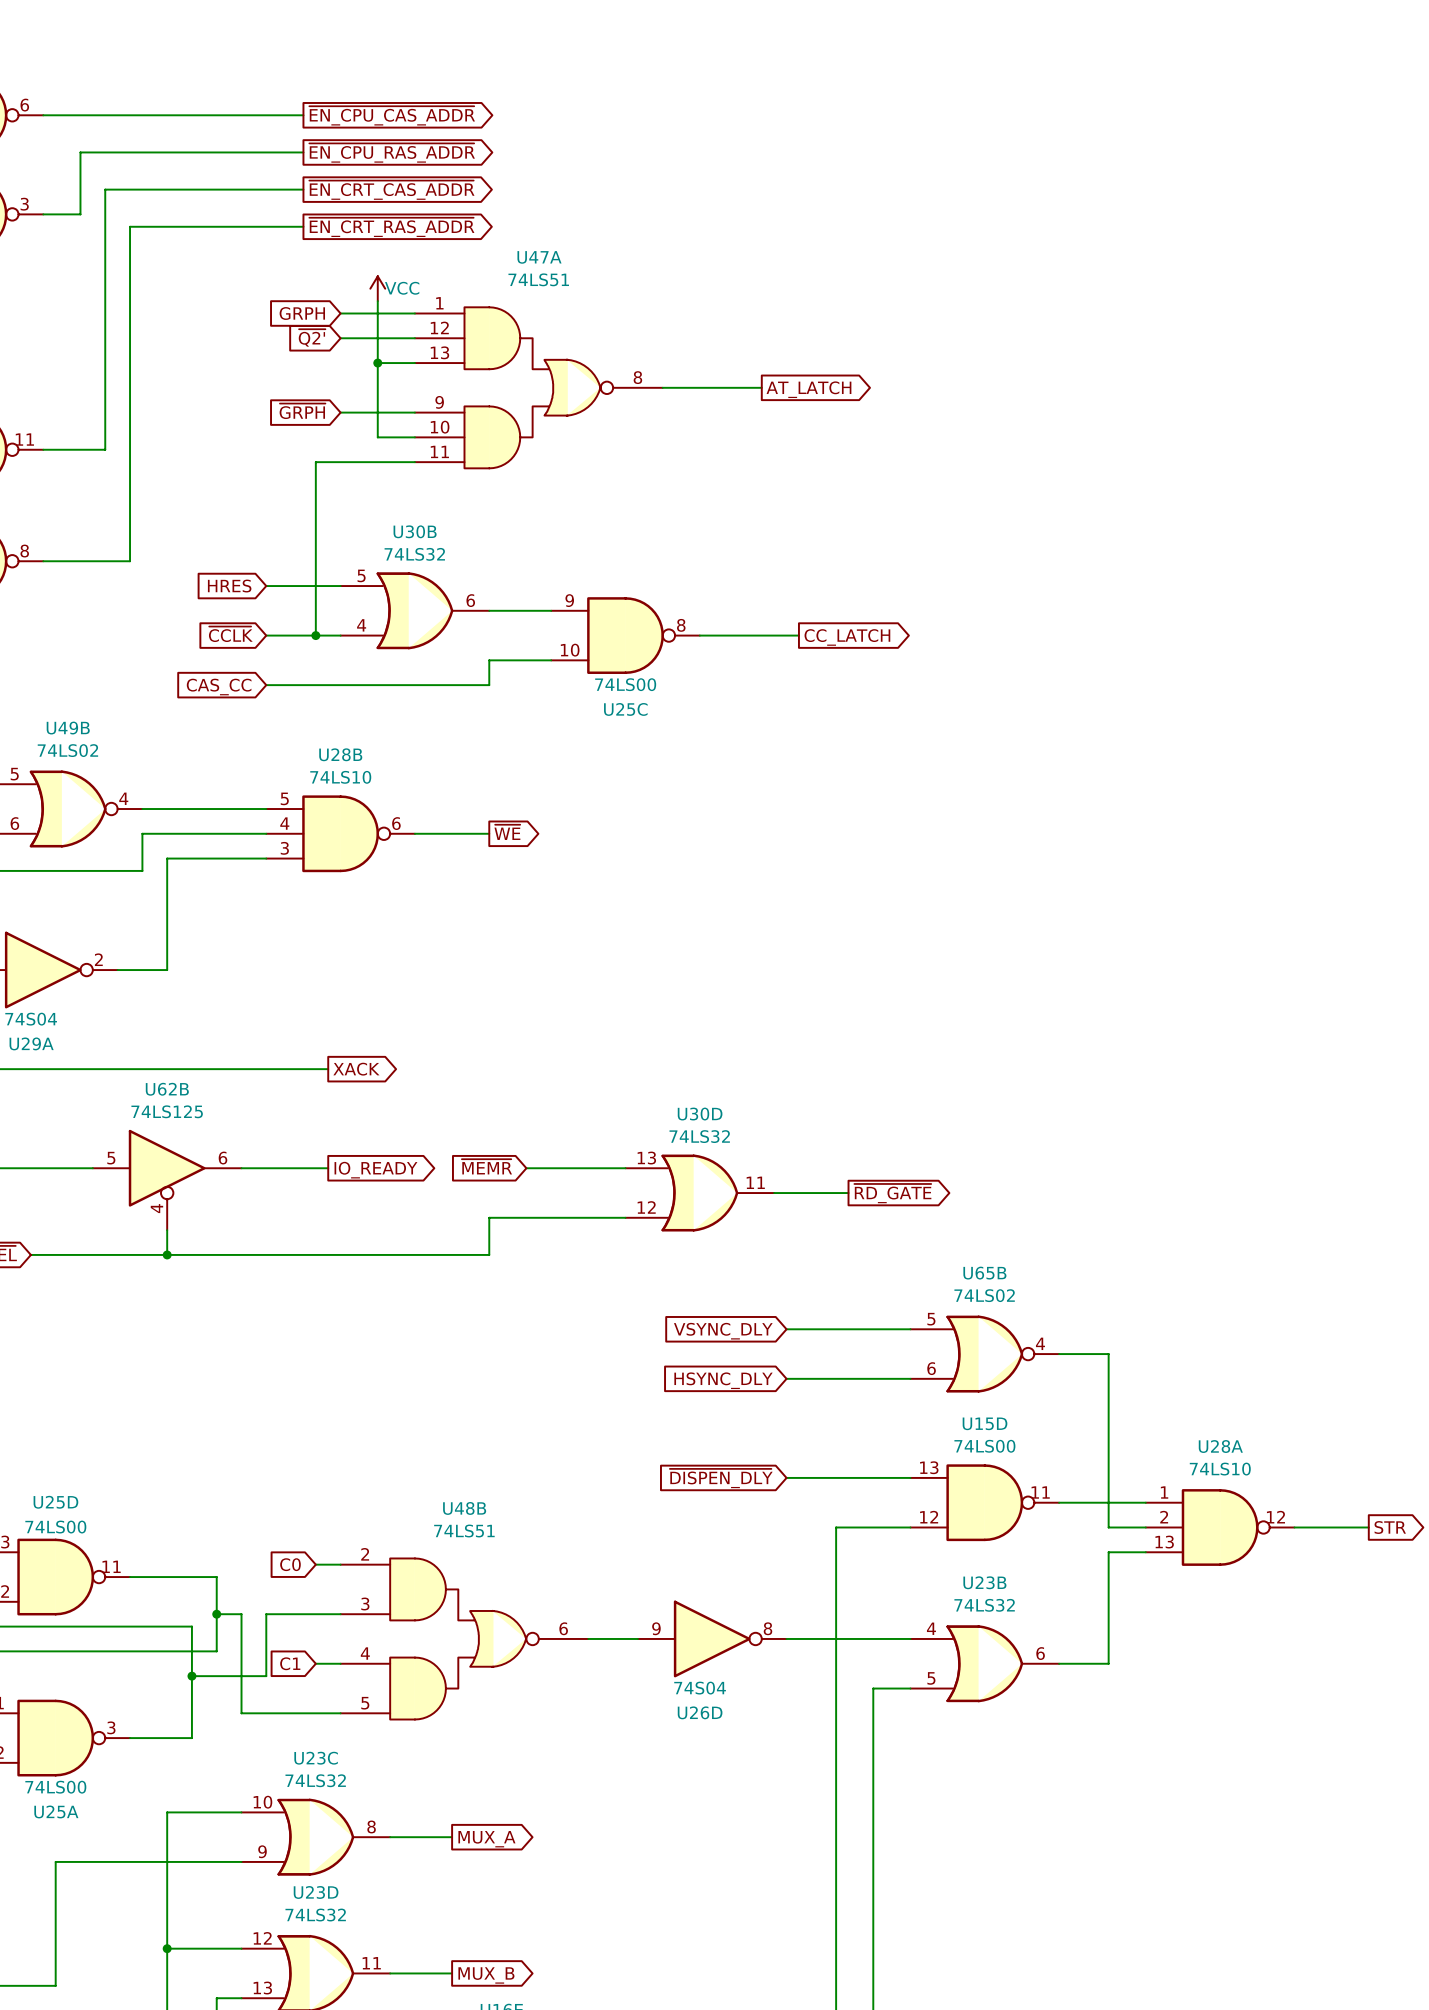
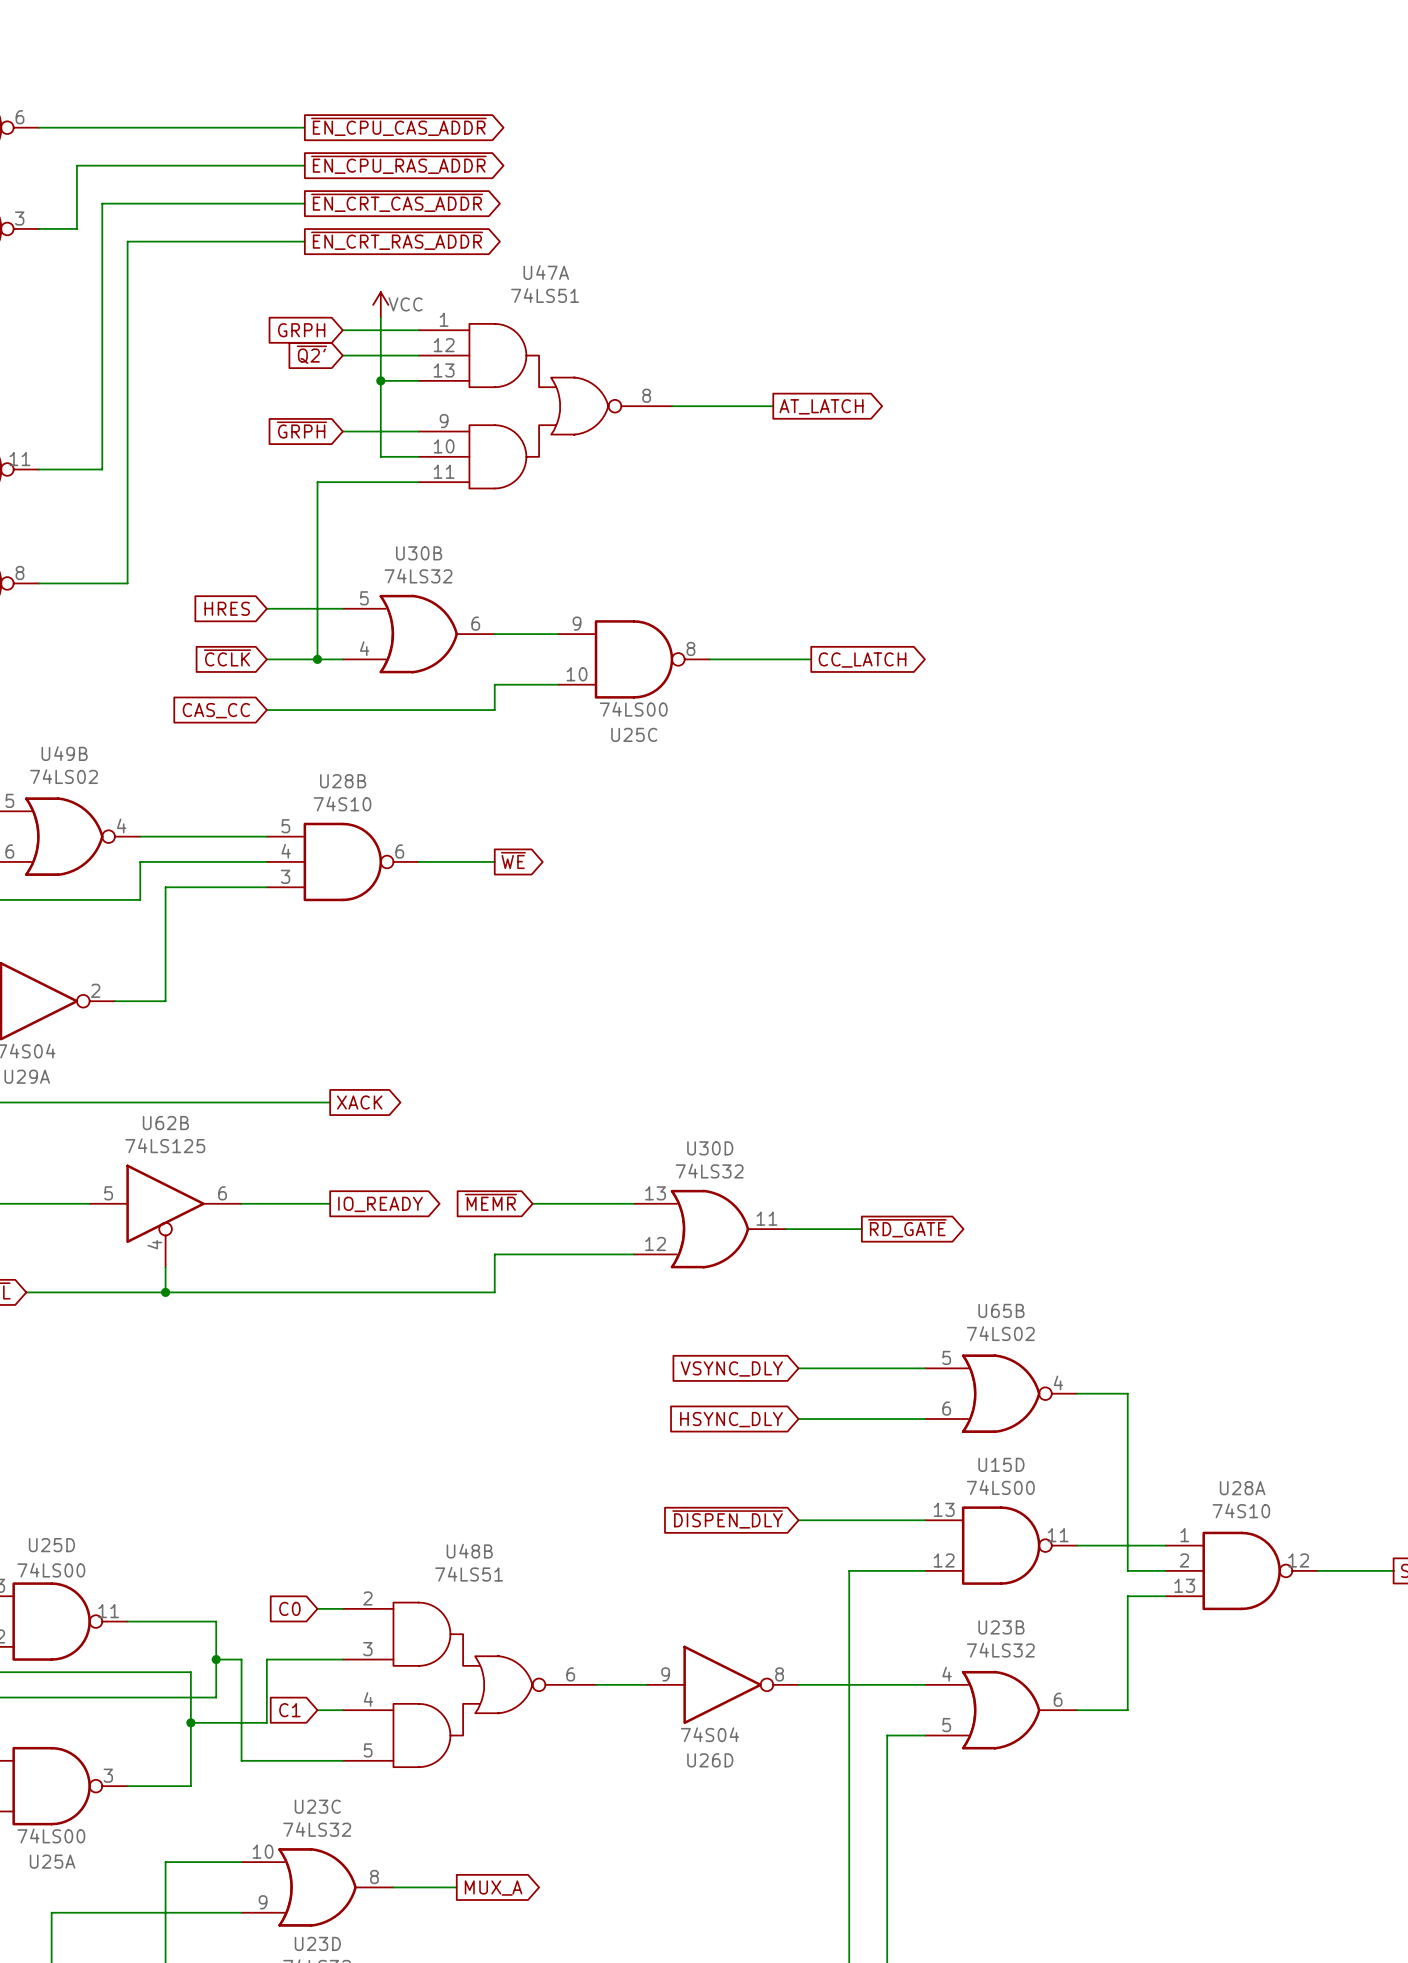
U28B value: 74LS10 (340, 777) -> 74S10 (342, 803)
U28A value: 74LS10 (1220, 1469) -> 74S10 (1241, 1510)

